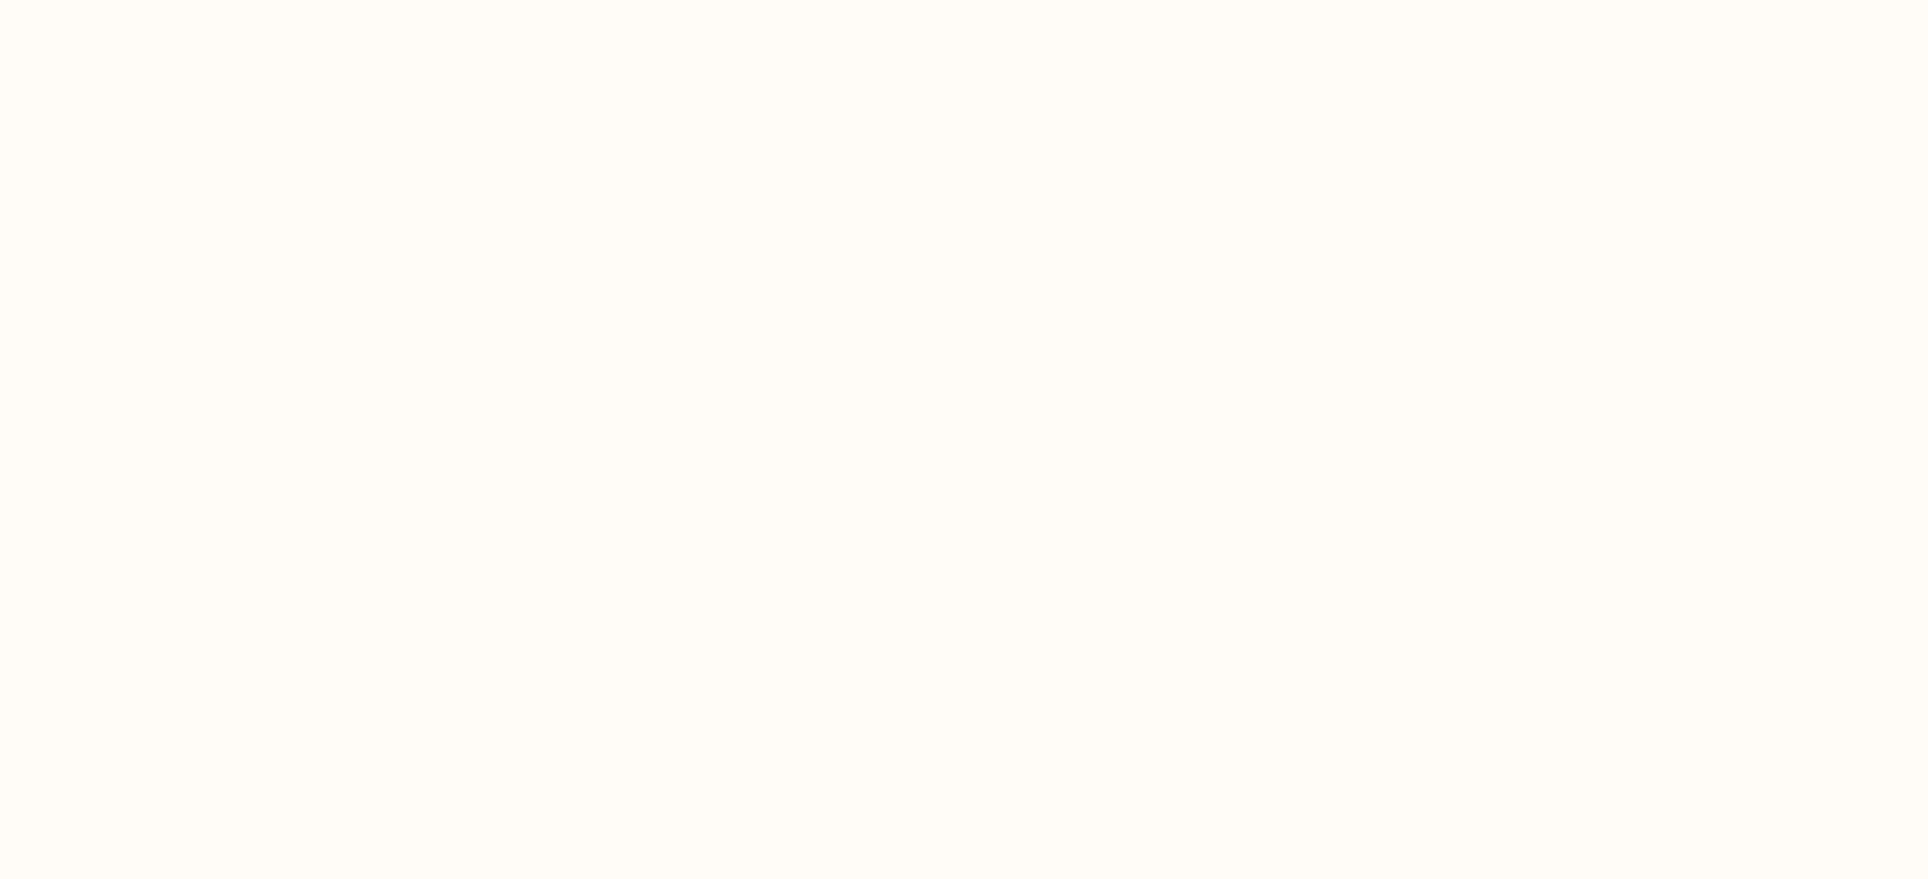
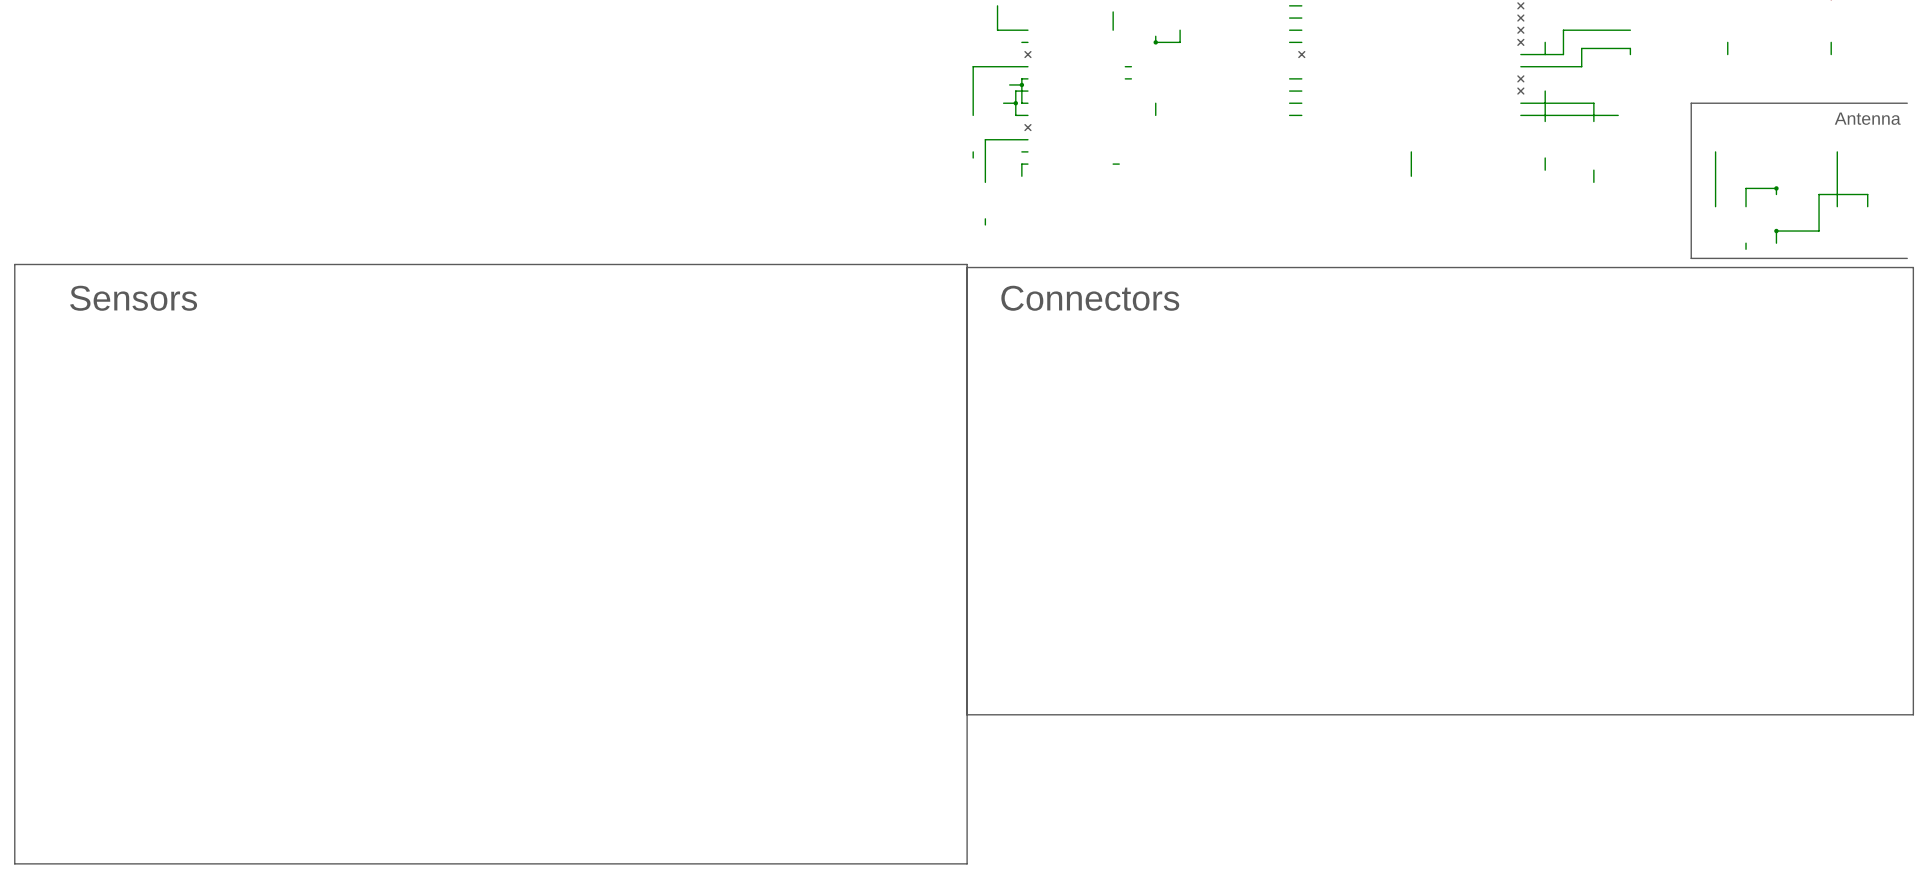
wire: none -> (997, 5) (997, 30) (1027, 30)
wire: none -> (1289, 5) (1301, 5)
no-connect mark: none -> (1520, 5)
wire: none -> (1113, 11) (1113, 30)
wire: none -> (1289, 18) (1301, 18)
no-connect mark: none -> (1520, 18)
wire: none -> (1180, 30) (1180, 42) (1155, 42) (1155, 36)
wire: none -> (1289, 30) (1301, 30)
no-connect mark: none -> (1520, 30)
wire: none -> (1630, 30) (1563, 30) (1563, 54) (1520, 54)
wire: none -> (1021, 42) (1027, 42)
junction: none -> (1155, 42)
wire: none -> (1289, 42) (1301, 42)
no-connect mark: none -> (1520, 42)
wire: none -> (1545, 42) (1545, 54)
wire: none -> (1727, 42) (1727, 54)
wire: none -> (1831, 42) (1831, 54)
no-connect mark: none -> (1027, 54)
no-connect mark: none -> (1301, 54)
wire: none -> (1630, 54) (1630, 48) (1581, 48) (1581, 66) (1520, 66)
wire: none -> (1027, 66) (973, 66) (973, 115)
wire: none -> (1125, 66) (1131, 66)
wire: none -> (1027, 78) (1021, 78) (1021, 103) (1027, 103)
wire: none -> (1125, 78) (1131, 78)
wire: none -> (1289, 78) (1301, 78)
no-connect mark: none -> (1520, 78)
wire: none -> (1009, 84) (1021, 84)
junction: none -> (1021, 84)
wire: none -> (1027, 91) (1015, 91) (1015, 115) (1027, 115)
wire: none -> (1289, 91) (1301, 91)
no-connect mark: none -> (1520, 91)
wire: none -> (1545, 91) (1545, 121)
wire: none -> (1003, 103) (1015, 103)
junction: none -> (1015, 103)
wire: none -> (1155, 103) (1155, 115)
wire: none -> (1289, 103) (1301, 103)
wire: none -> (1520, 103) (1593, 103) (1593, 121)
line: none -> (1907, 103) (1691, 103) (1691, 258) (1907, 258)
wire: none -> (1289, 115) (1301, 115)
wire: none -> (1520, 115) (1618, 115)
text: none -> Antenna (1867, 118)
no-connect mark: none -> (1027, 127)
wire: none -> (1027, 139) (985, 139) (985, 182)
wire: none -> (973, 151) (973, 157)
wire: none -> (1021, 151) (1027, 151)
wire: none -> (1411, 151) (1411, 176)
wire: none -> (1715, 151) (1715, 206)
wire: none -> (1837, 151) (1837, 206)
wire: none -> (1545, 157) (1545, 170)
wire: none -> (1027, 164) (1021, 164) (1021, 176)
wire: none -> (1113, 164) (1119, 164)
wire: none -> (1593, 170) (1593, 182)
junction: none -> (1776, 188)
wire: none -> (1776, 194) (1776, 188) (1746, 188) (1746, 206)
wire: none -> (1867, 206) (1867, 194) (1819, 194) (1819, 231) (1776, 231) (1776, 243)
wire: none -> (985, 218) (985, 224)
junction: none -> (1776, 231)
wire: none -> (1746, 243) (1746, 249)
line: none -> (14, 264) (967, 264) (967, 863) (14, 863) (14, 264)
line: none -> (967, 267) (1913, 267) (1913, 714) (967, 714)
text: none -> Sensors (133, 298)
text: none -> Connectors (1090, 298)

